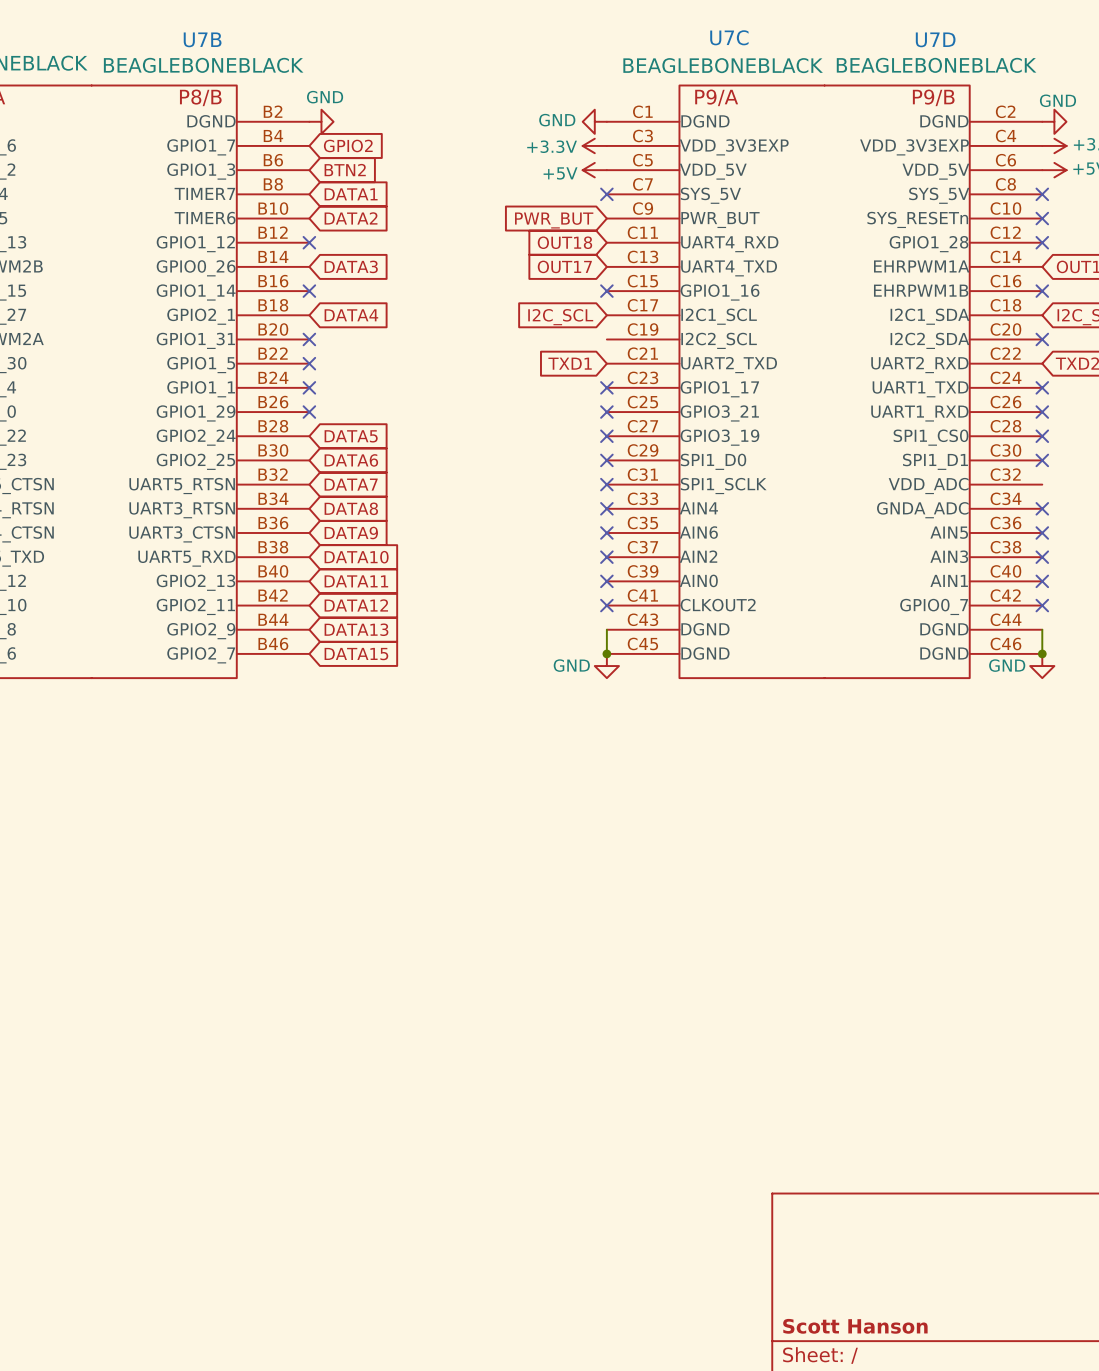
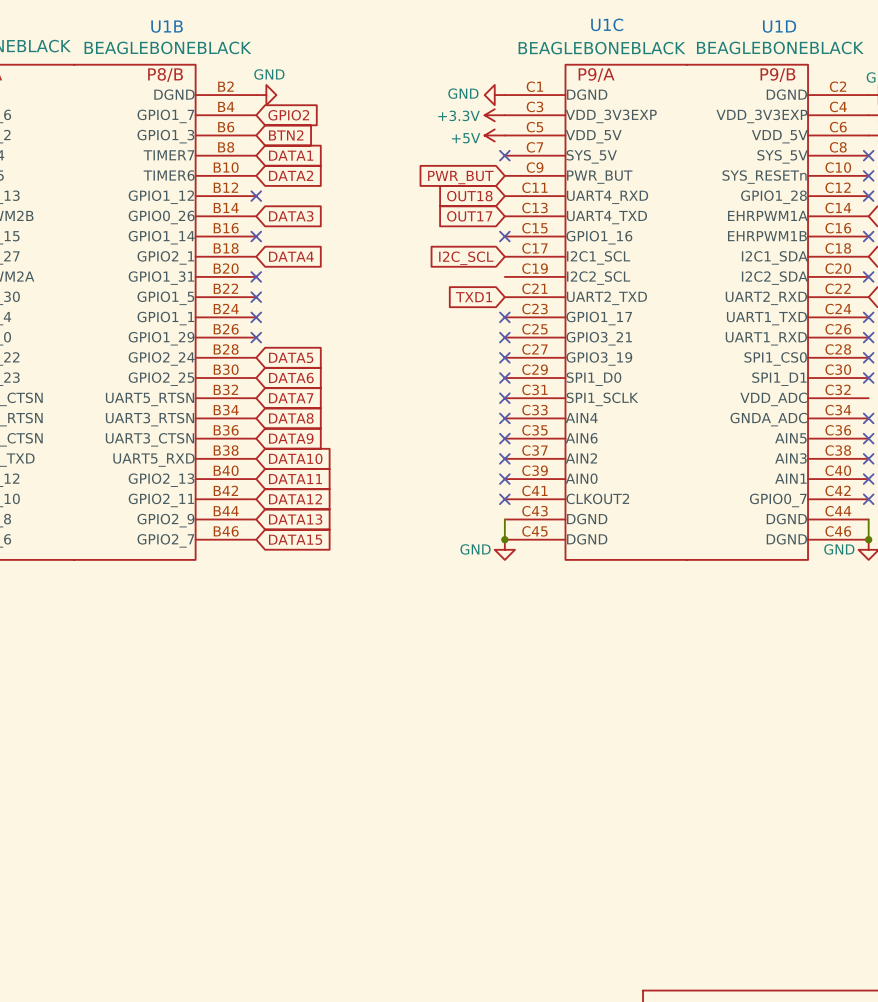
U7C name: U7C (729, 37) -> U1C (607, 24)
U7B name: U7B (202, 39) -> U1B (167, 26)
U7D name: U7D (935, 39) -> U1D (779, 26)

